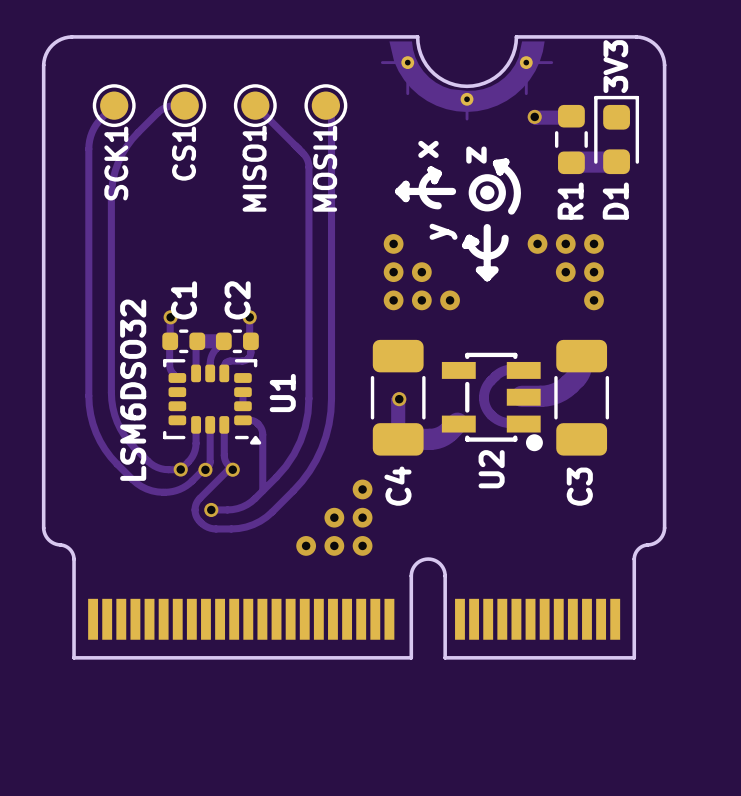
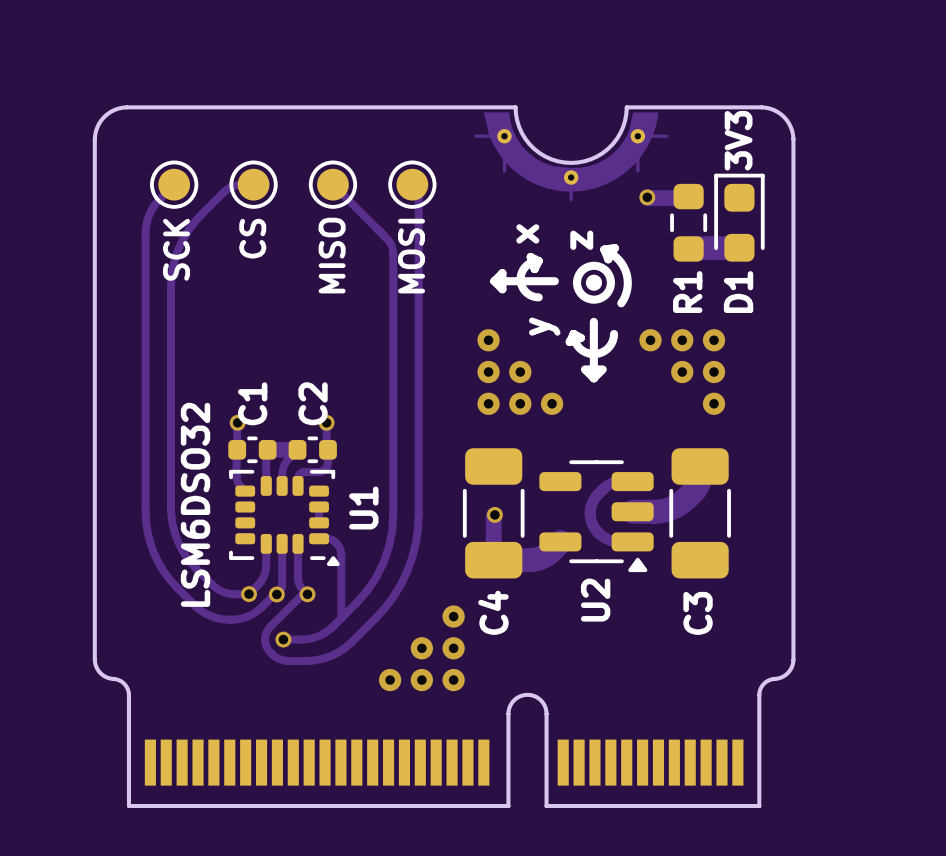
CS1 name: CS1 (184, 153) -> CS (252, 238)
SCK1 name: SCK1 (116, 163) -> SCK (176, 249)
MISO1 name: MISO1 (254, 168) -> MISO (332, 255)
MOSI1 name: MOSI1 (325, 168) -> MOSI (411, 256)
U2 footprint: [441, 352, 543, 452] -> [539, 460, 654, 573]

